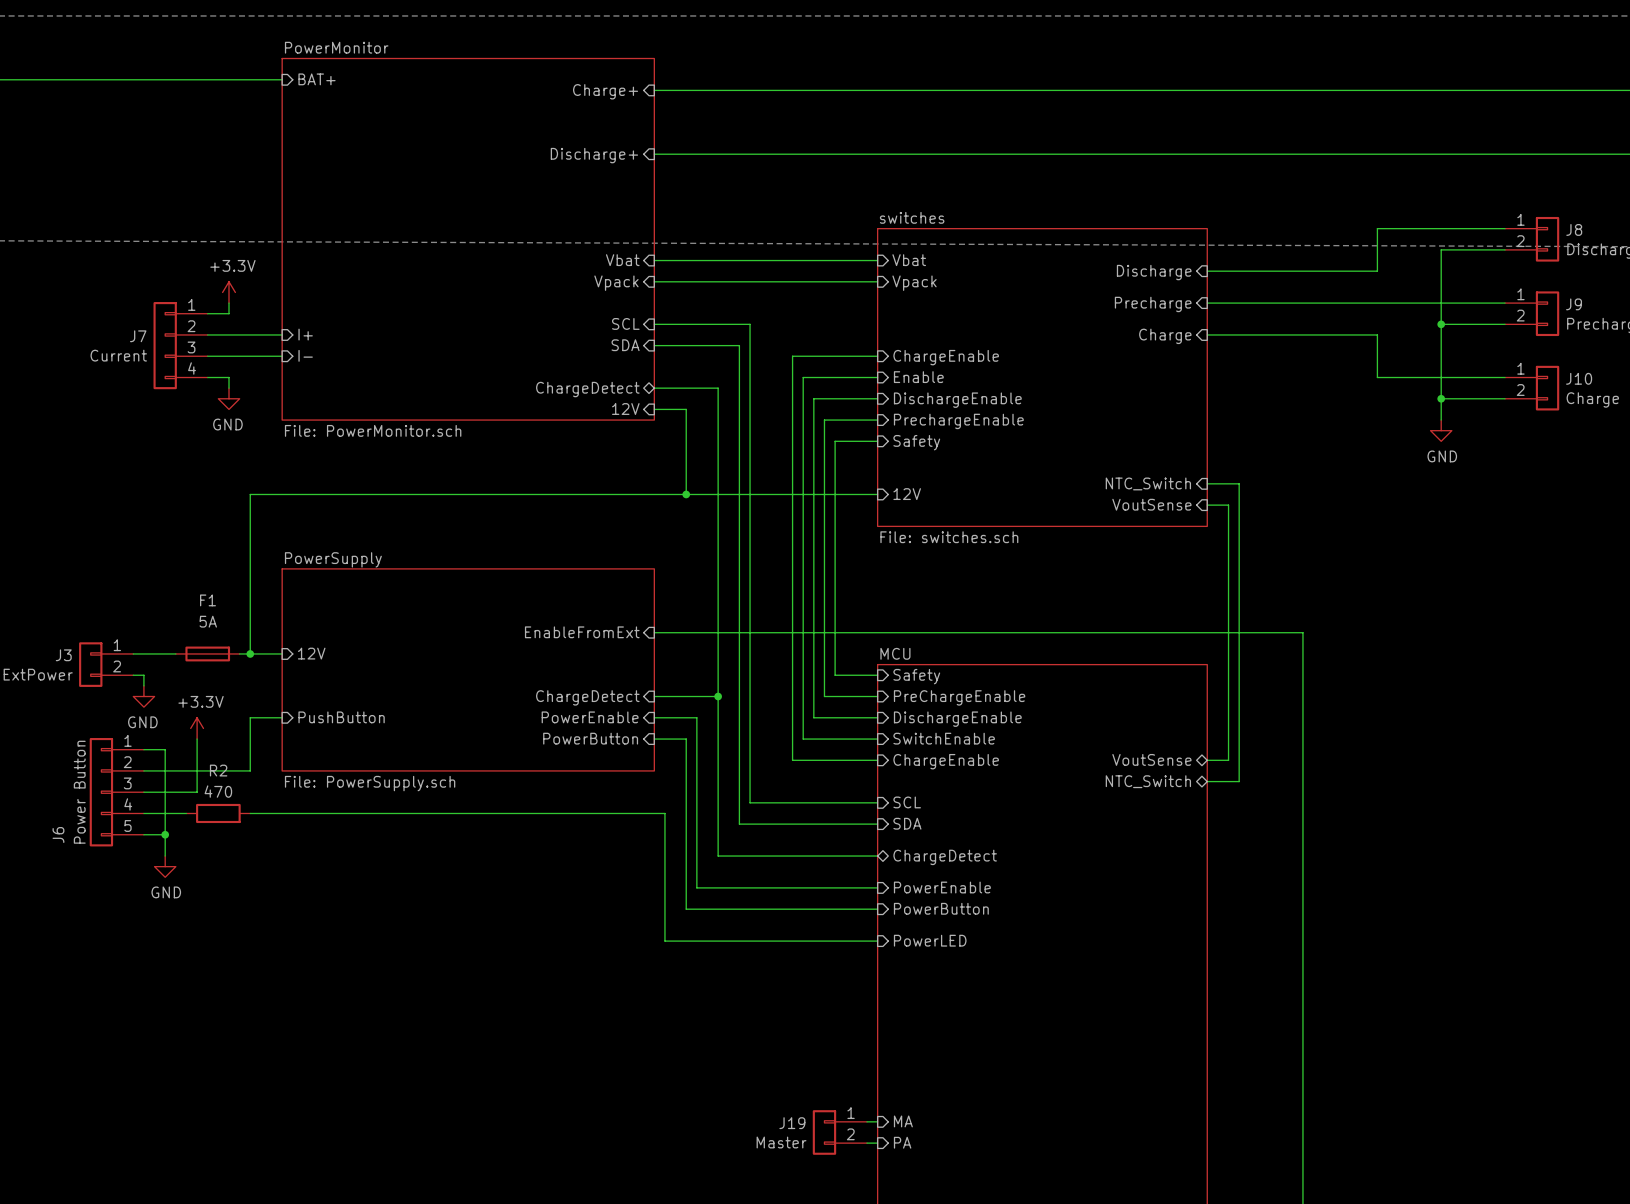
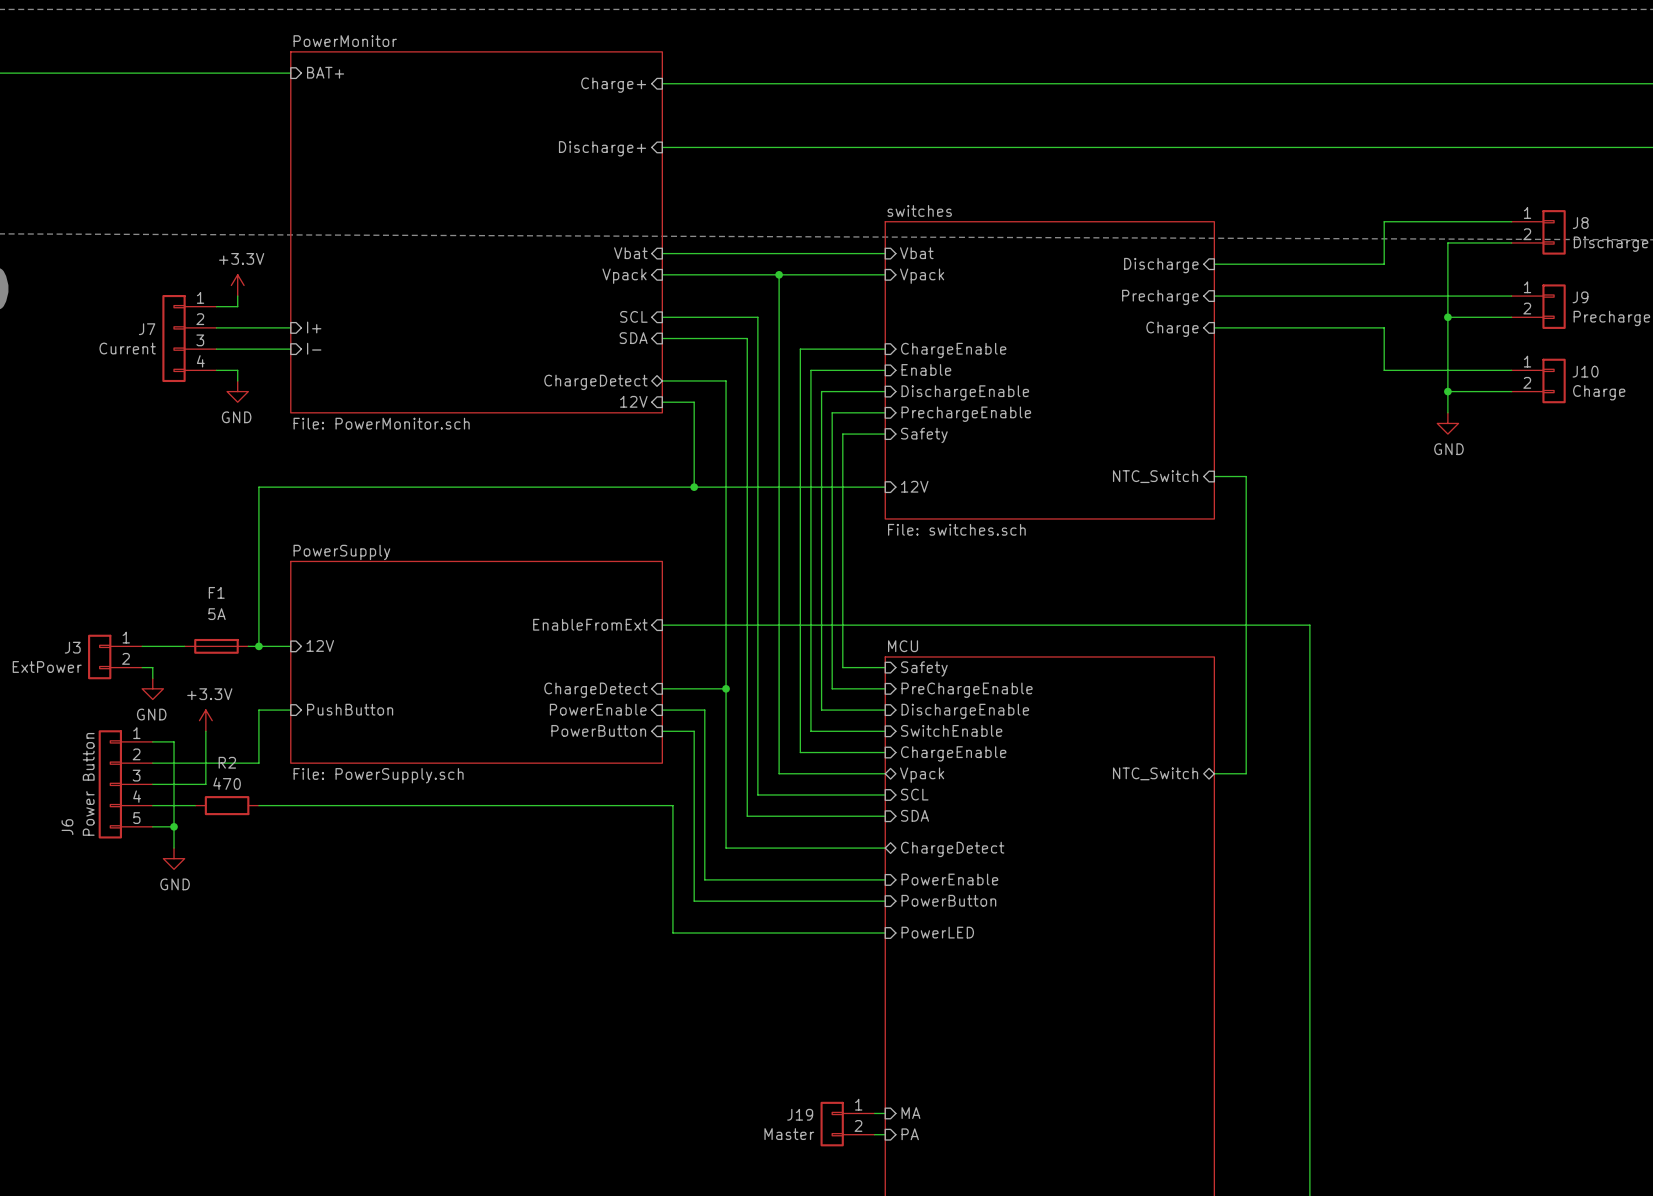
wire: none -> (779, 274) (779, 773) (885, 773)
junction: none -> (779, 274)
sheet pin: VoutSense (1151, 504) -> none
wire: (1207, 505) (1228, 505) (1228, 760) (1207, 760) -> none
sheet pin: VoutSense (1151, 759) -> none
sheet pin: none -> Vpack (922, 775)

